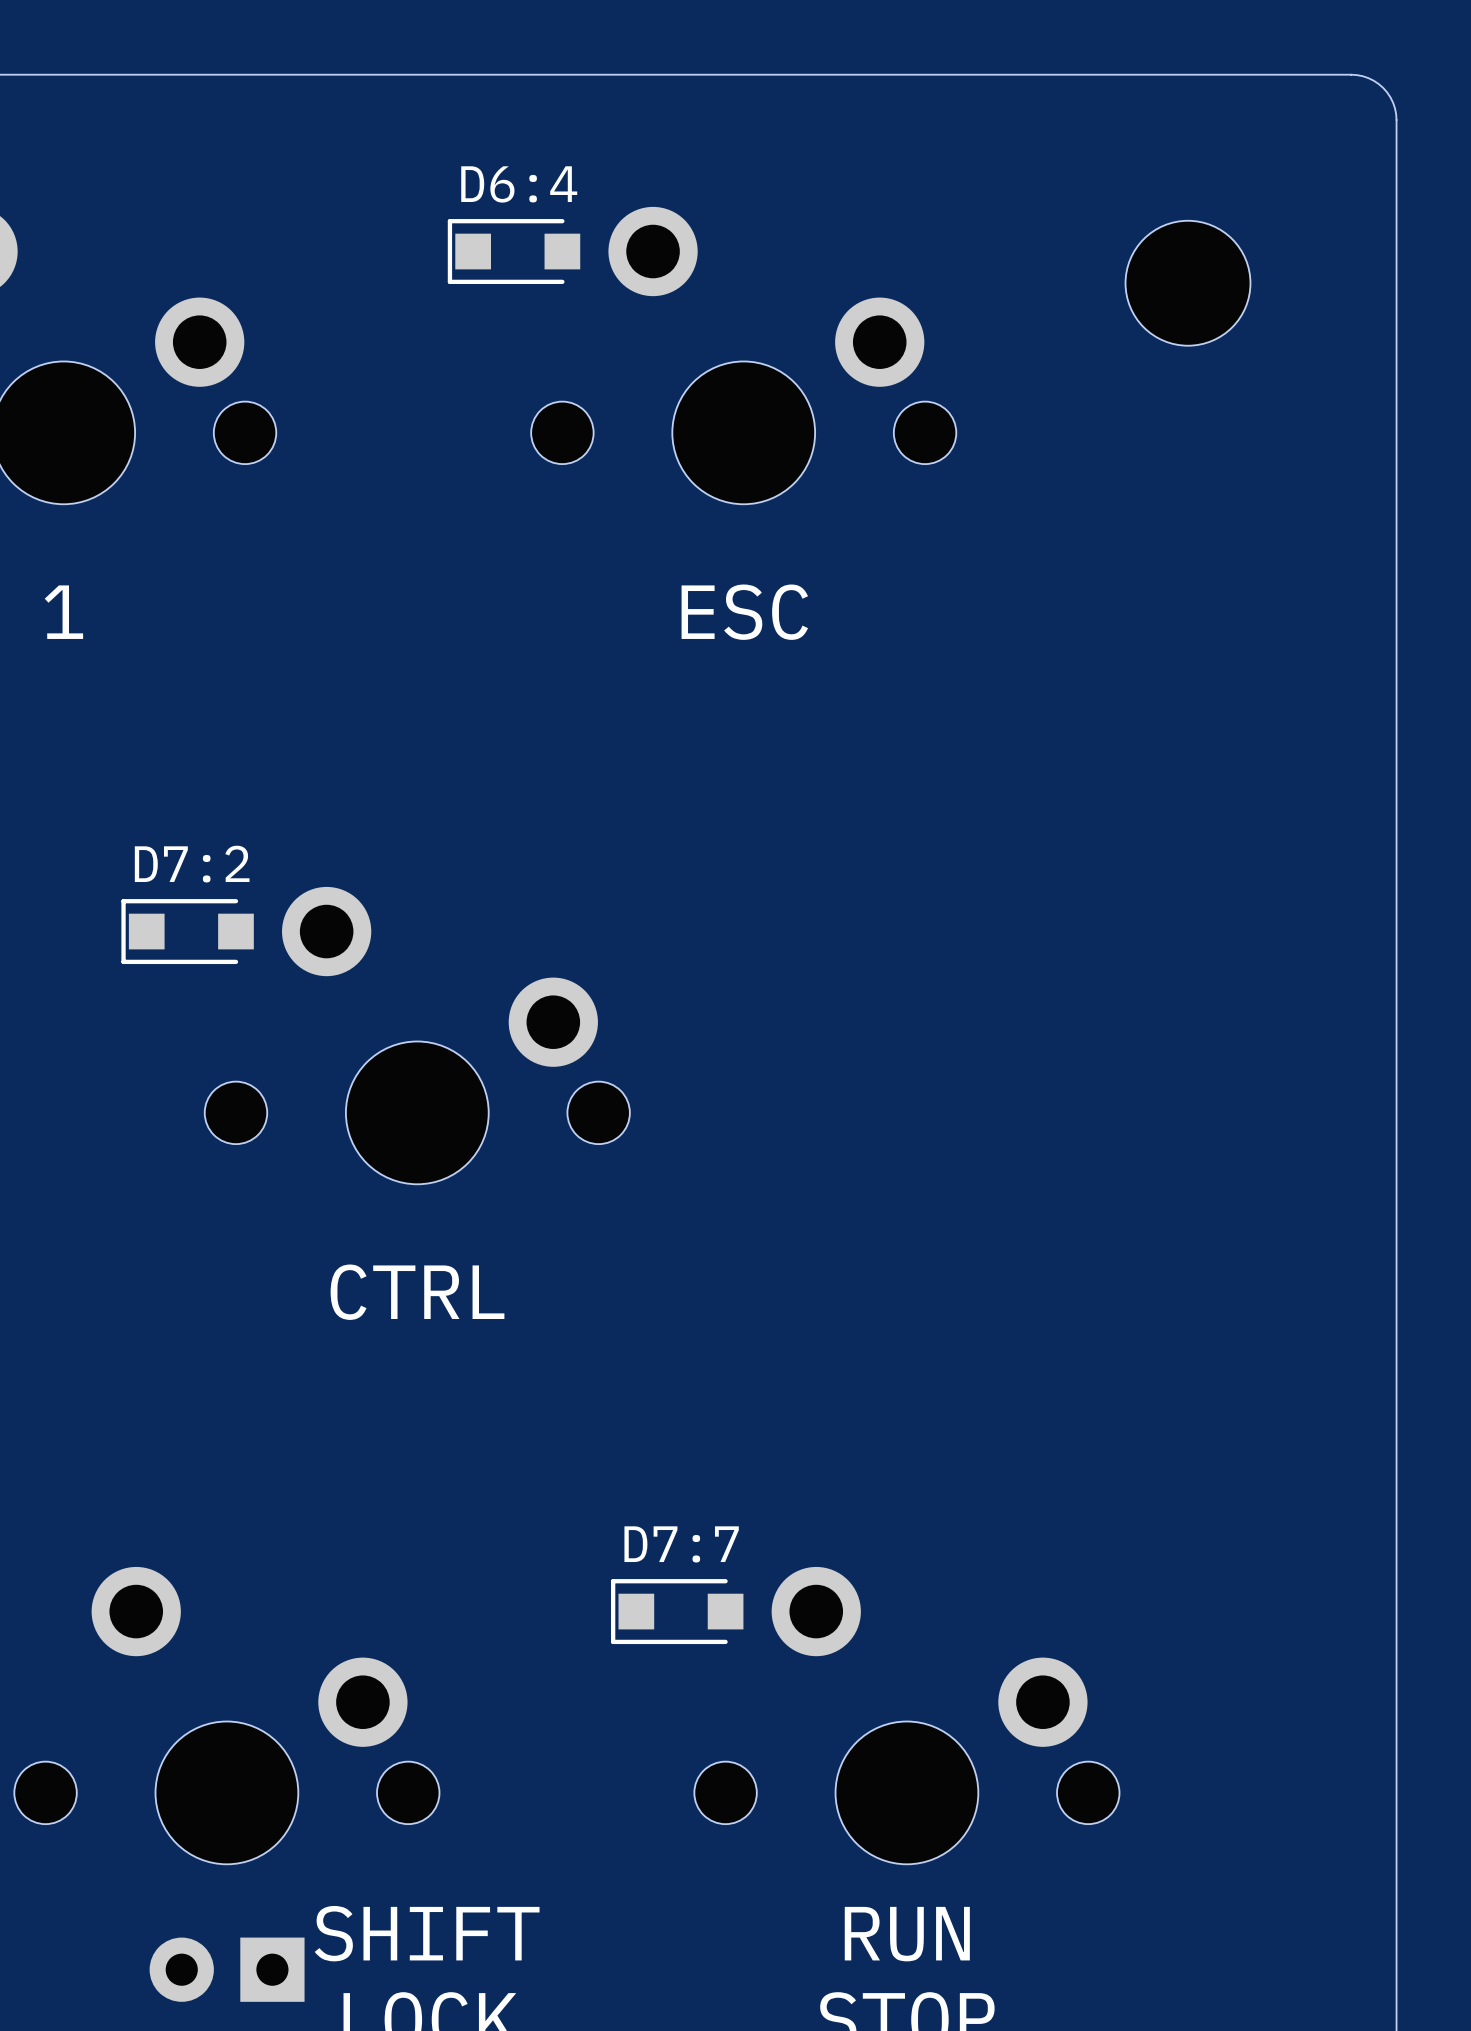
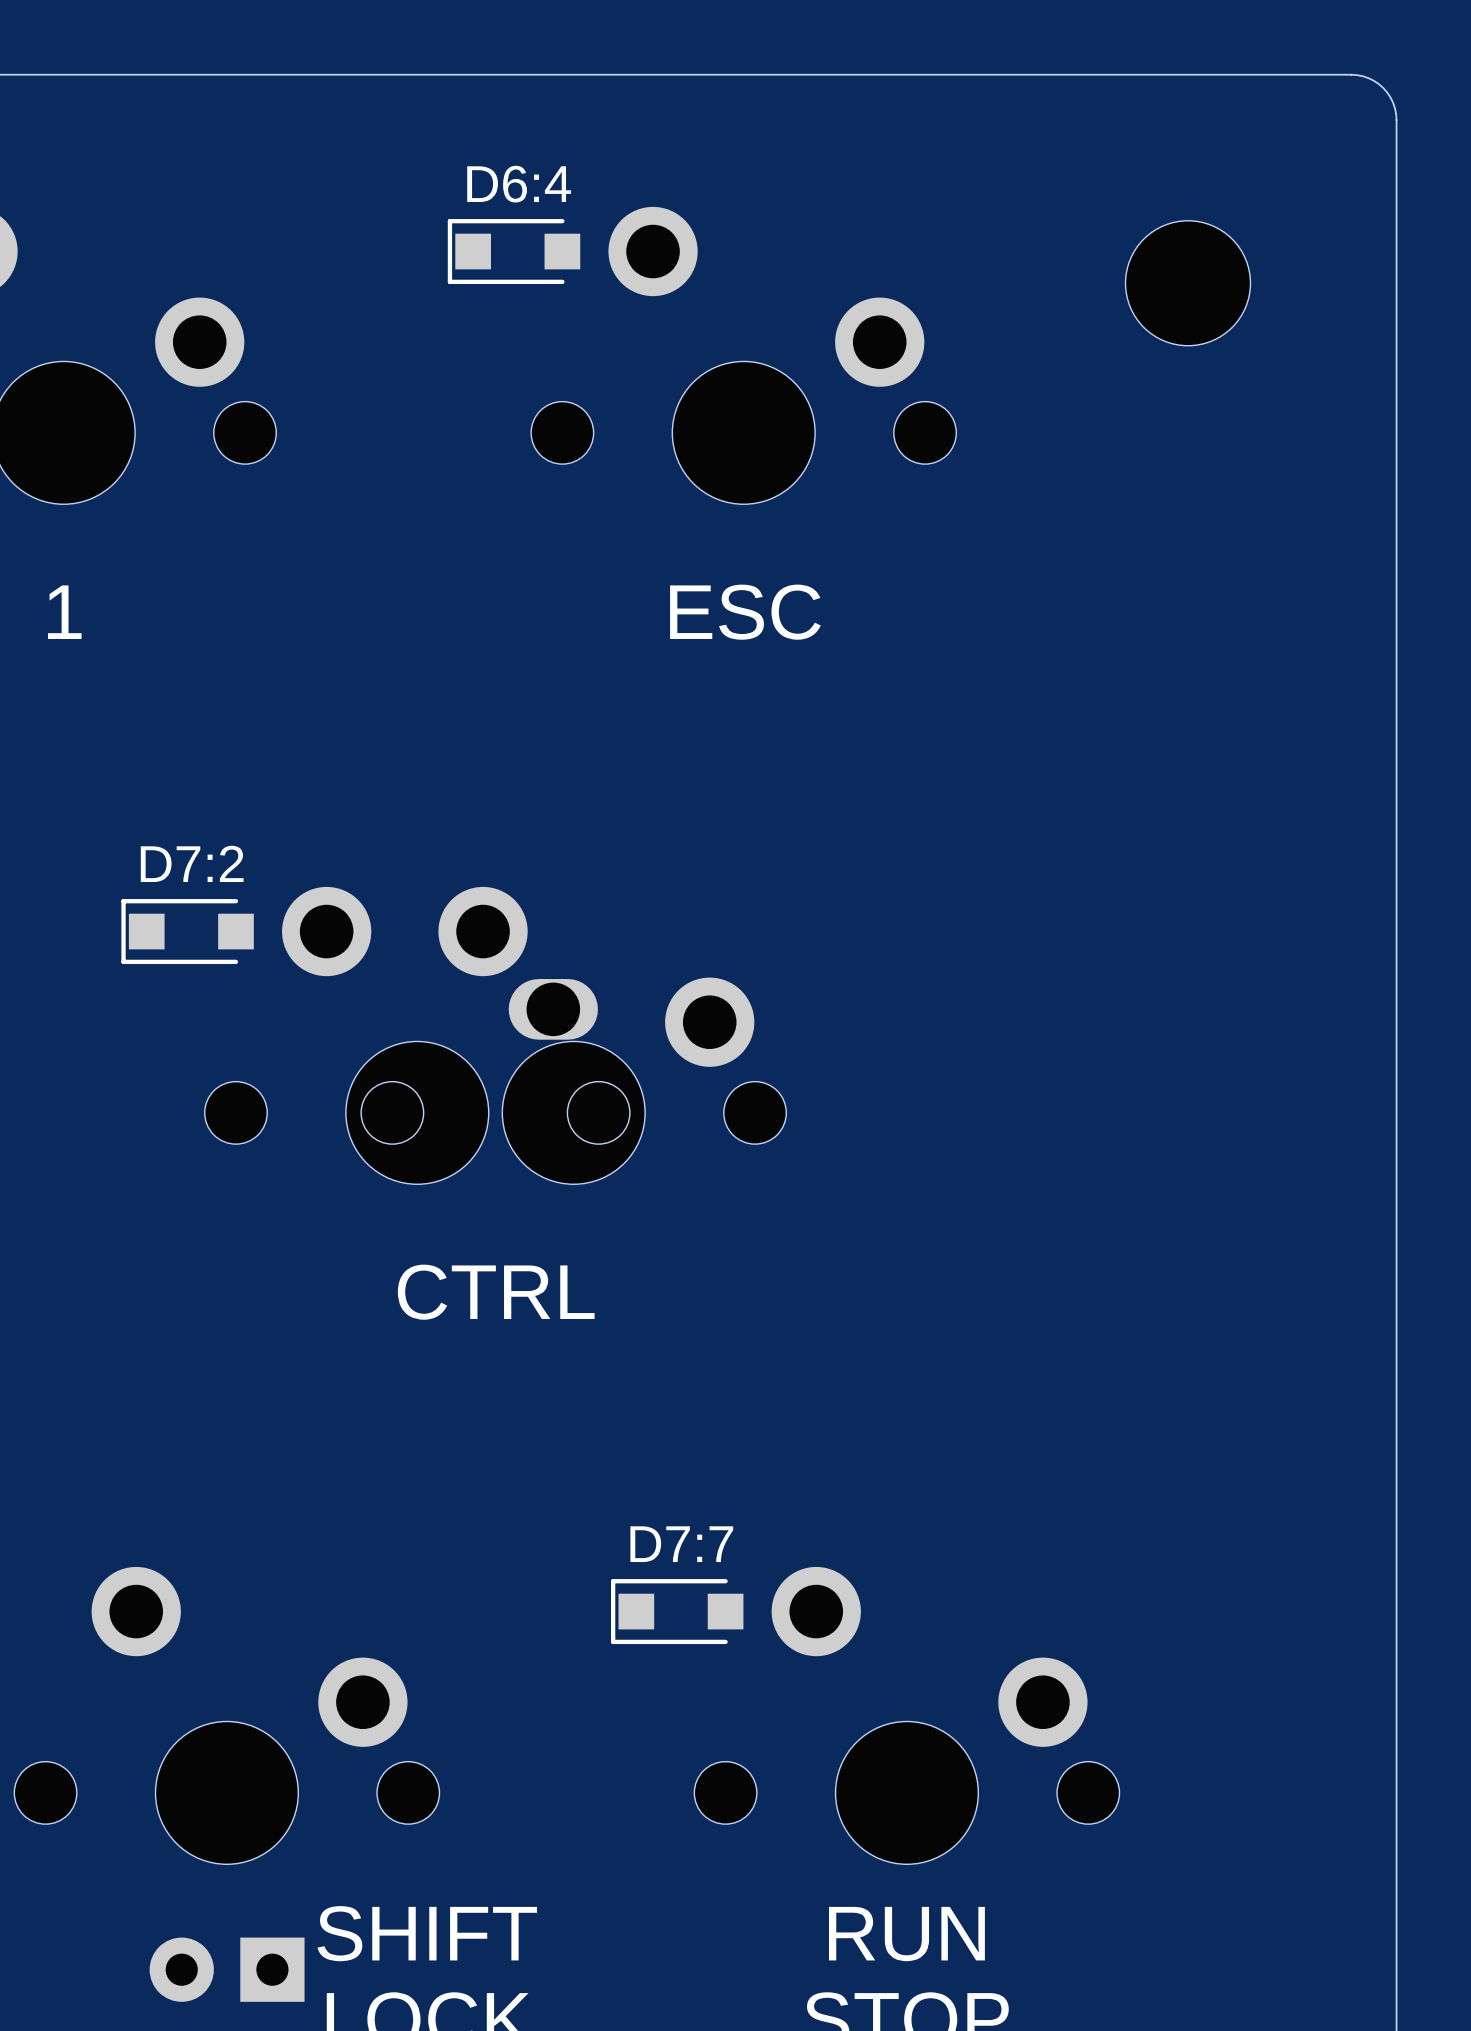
part footprint: [204, 886, 630, 1185] -> [204, 886, 630, 1185]
part: none -> (573, 1035)
text position: CTRL (417, 1292) -> CTRL (496, 1292)

